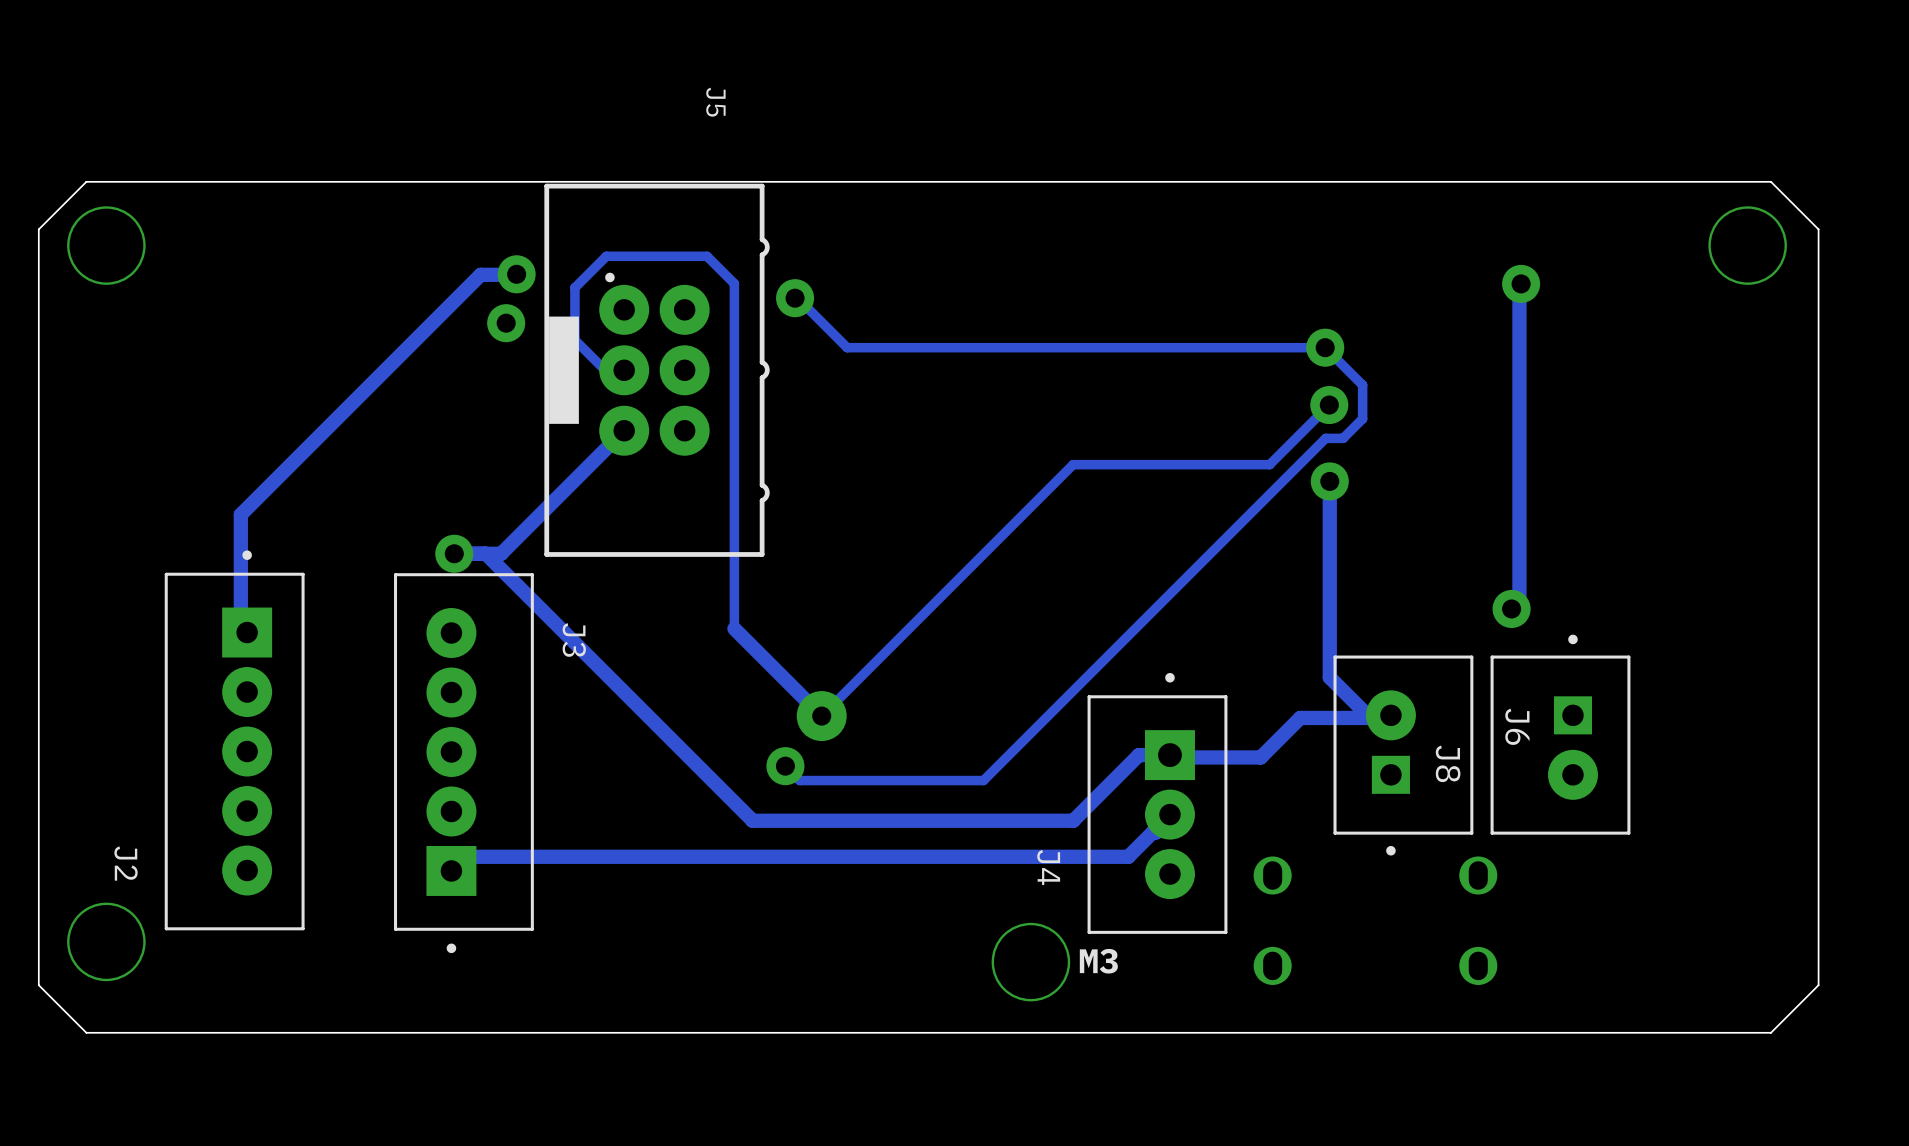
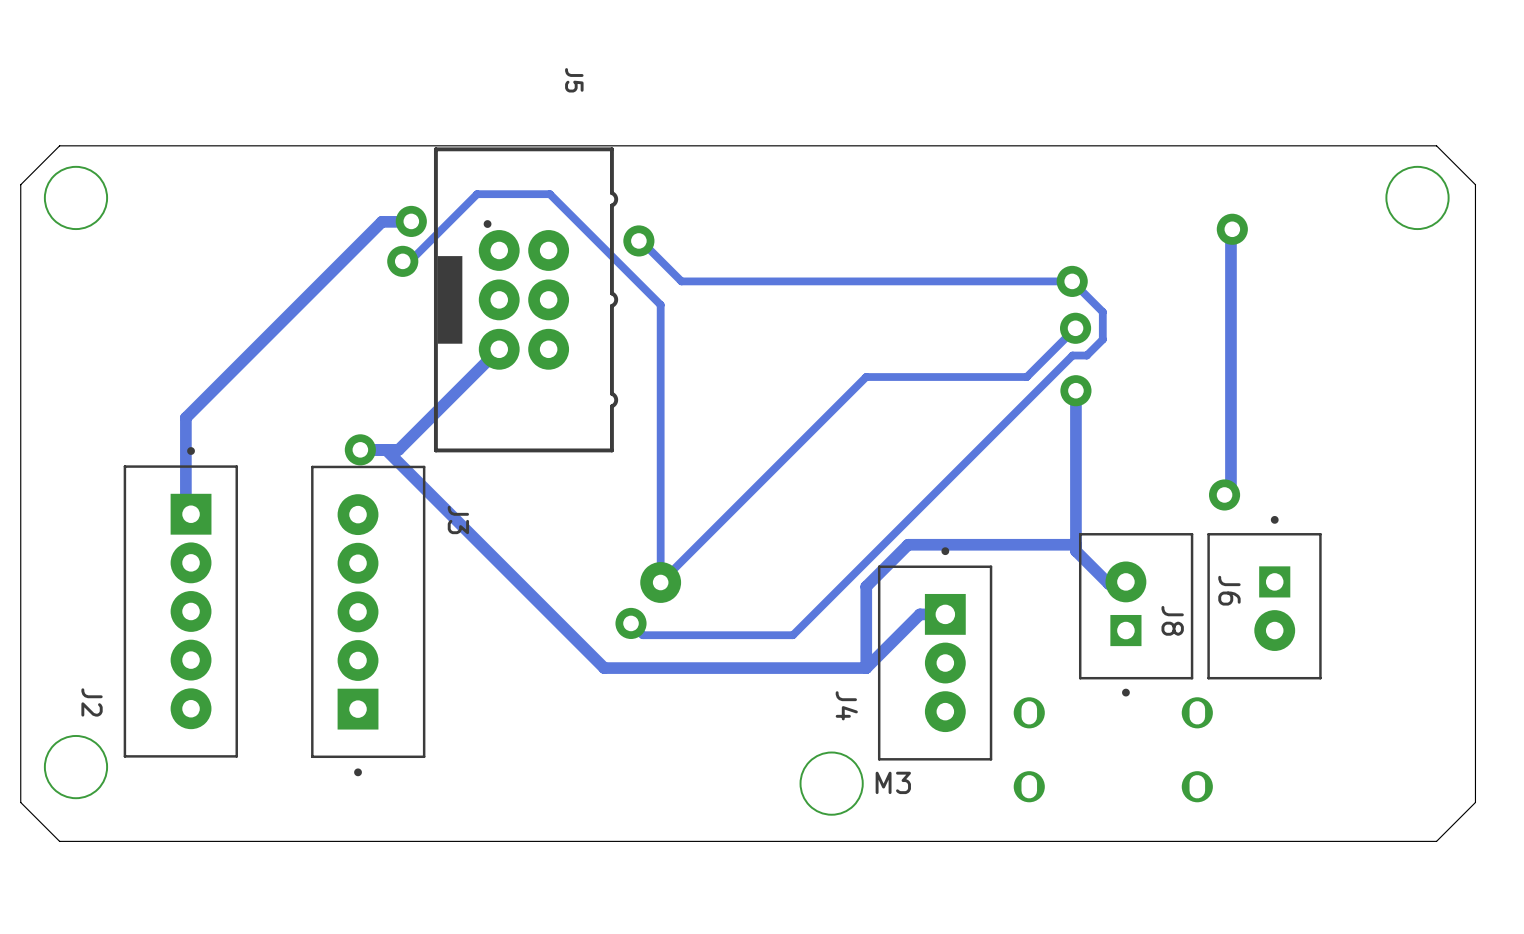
track: (624, 370) (605, 370) (574, 340) (574, 287) (606, 256) (707, 256) (734, 283) (734, 628) (821, 716) -> (409, 261) (477, 194) (549, 194) (660, 304) (660, 582)
track: none -> (1075, 544) (908, 544) (866, 586) (866, 668)
track: (1370, 717) (1300, 717) (1260, 757) (1171, 757) -> none
track: (1171, 816) (1128, 856) (465, 856) (451, 870) -> none

